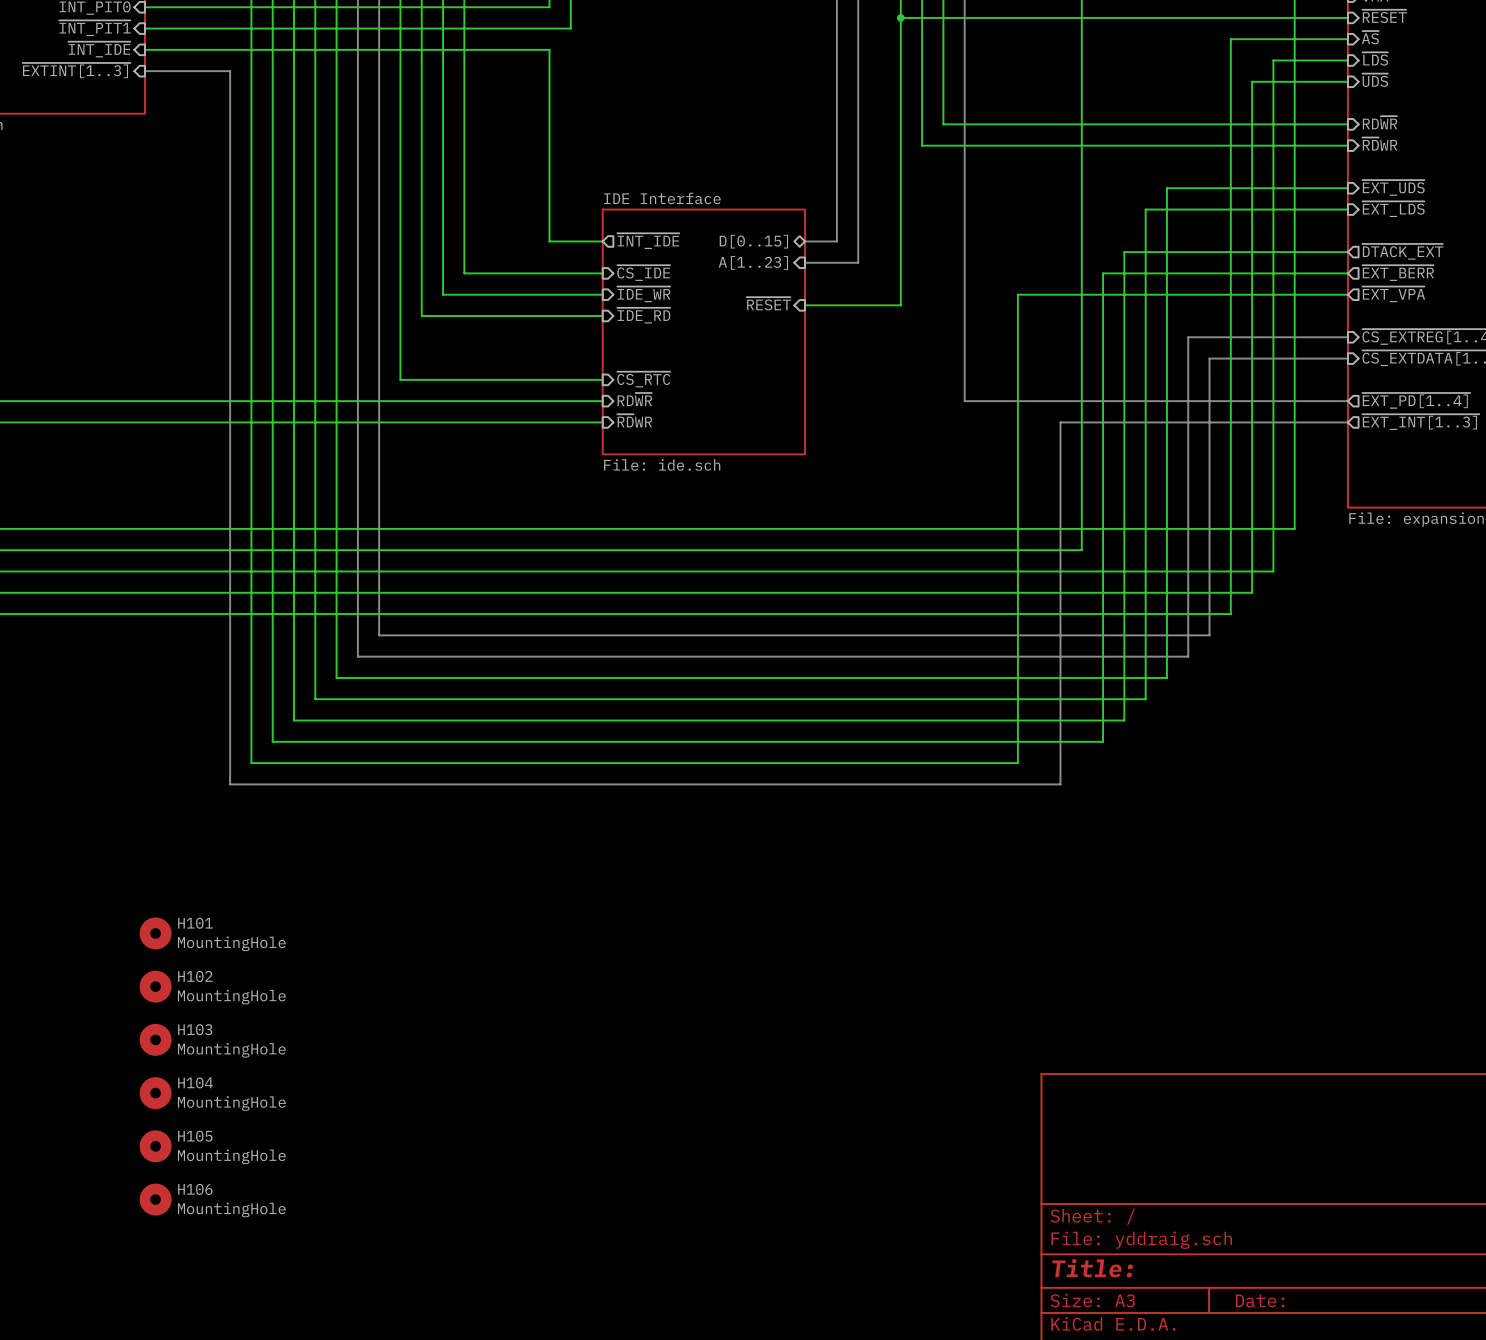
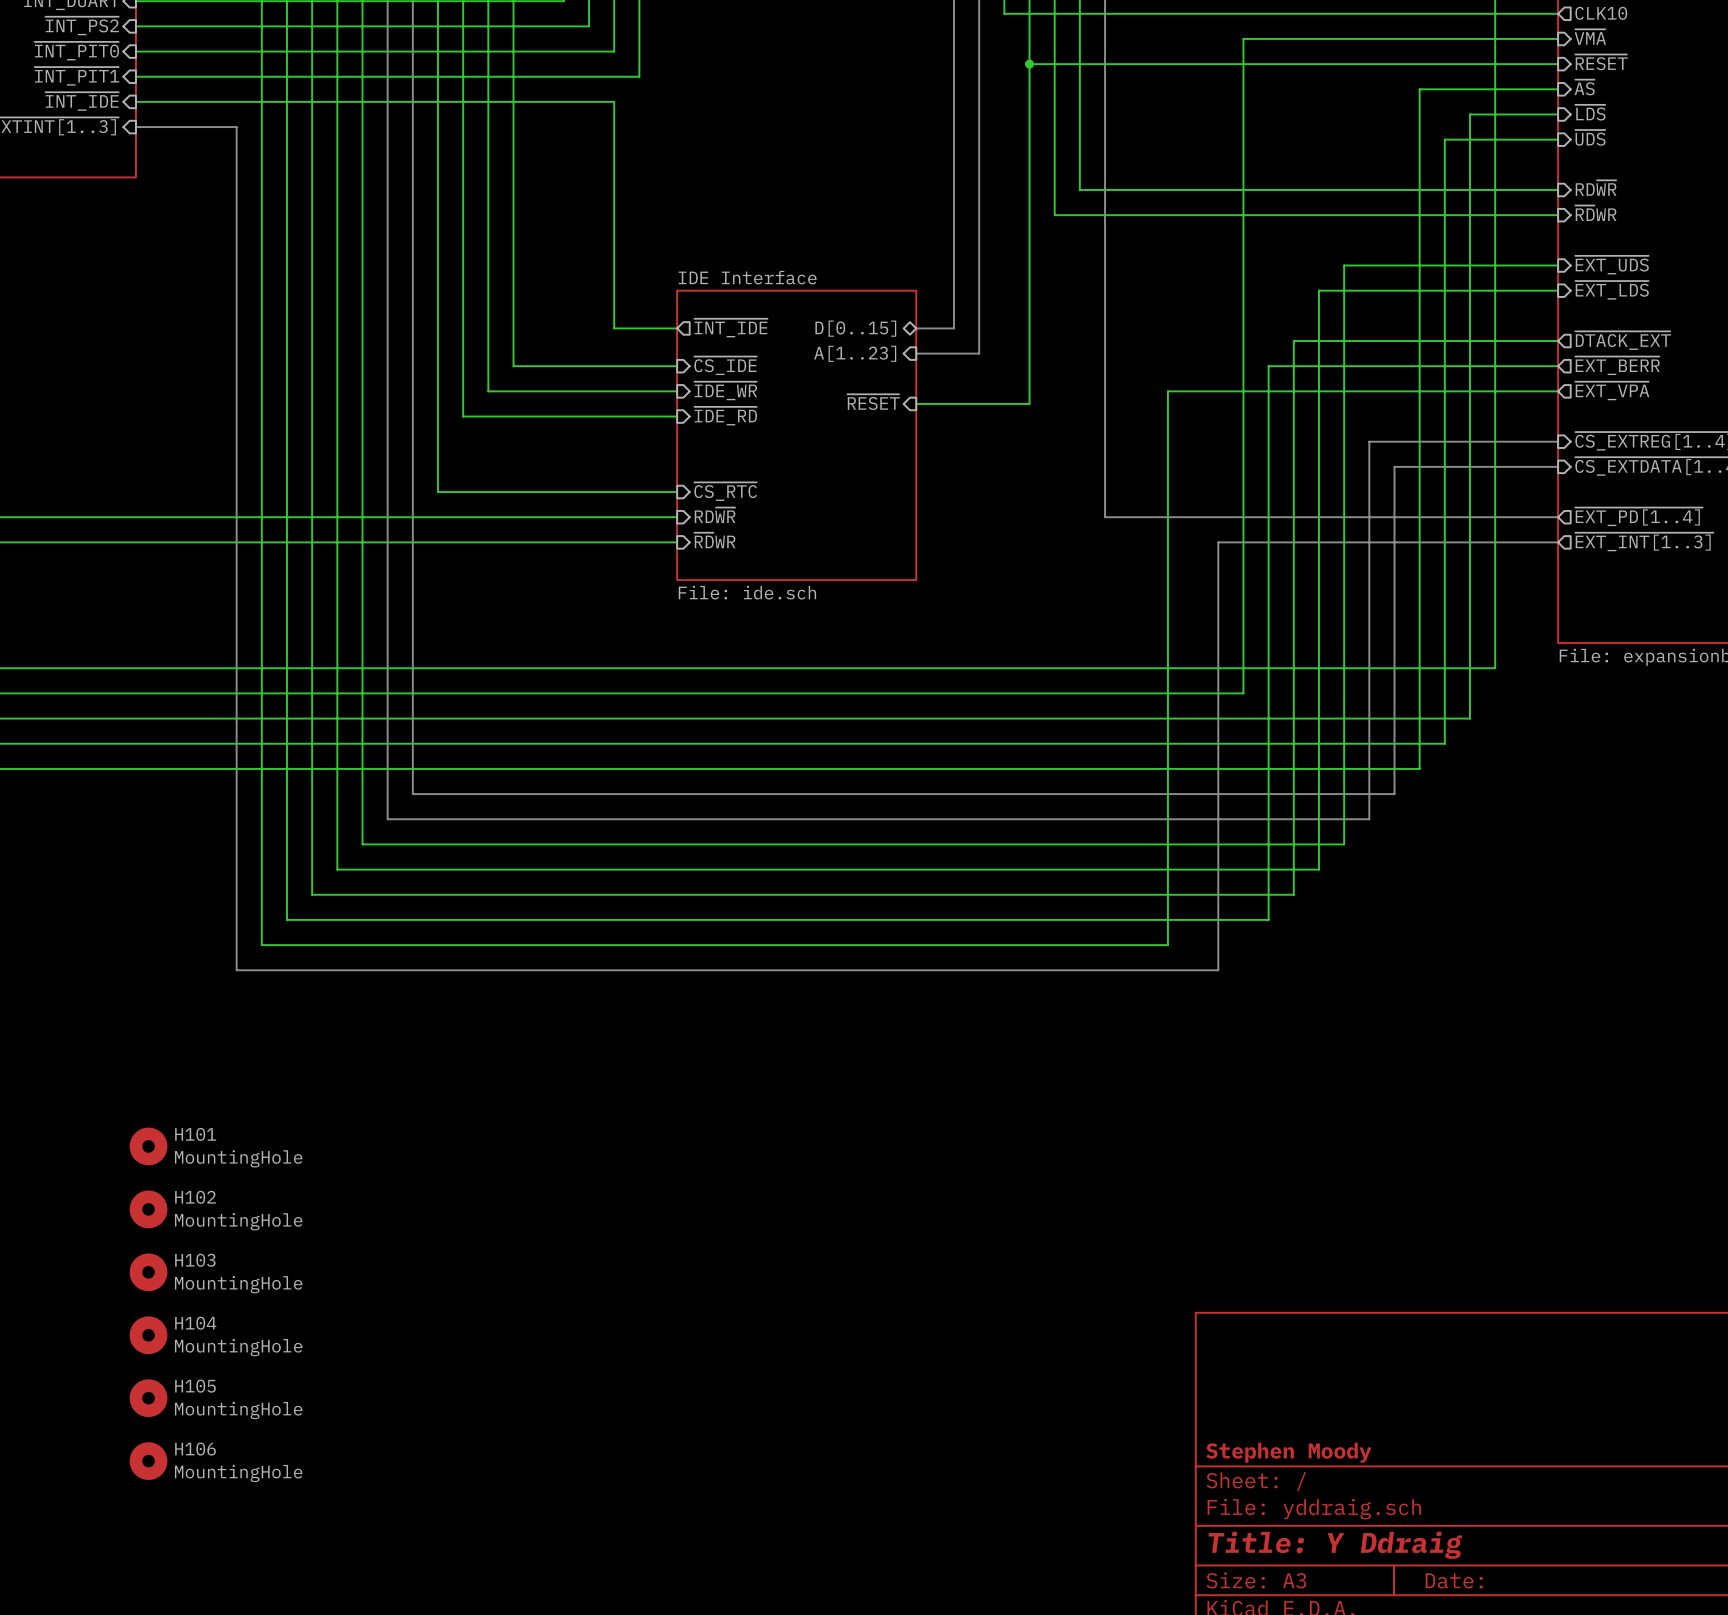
title block: none -> Stephen Moody (1288, 1452)
title block: Title: (1092, 1268) -> Title: Y Ddraig (1335, 1545)

